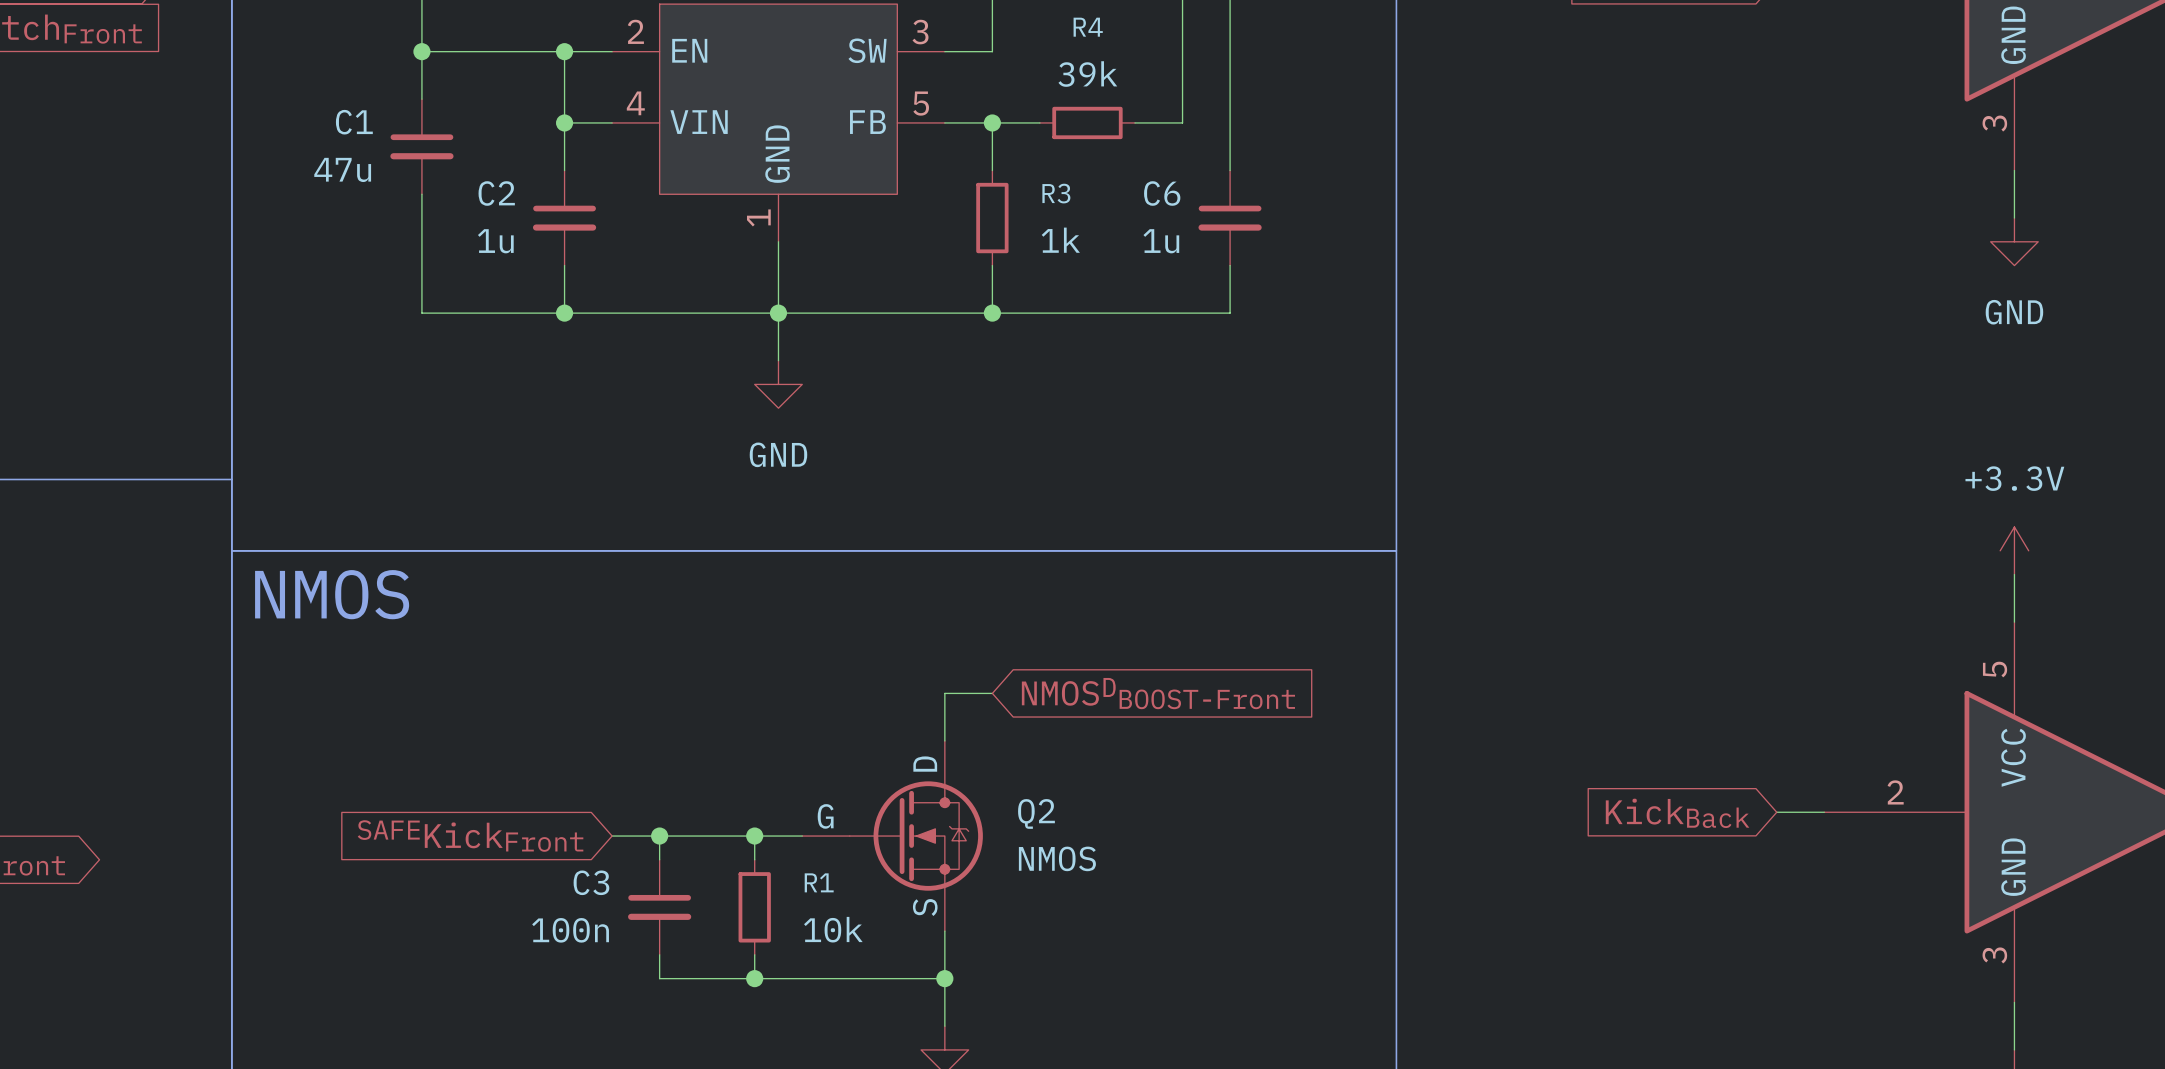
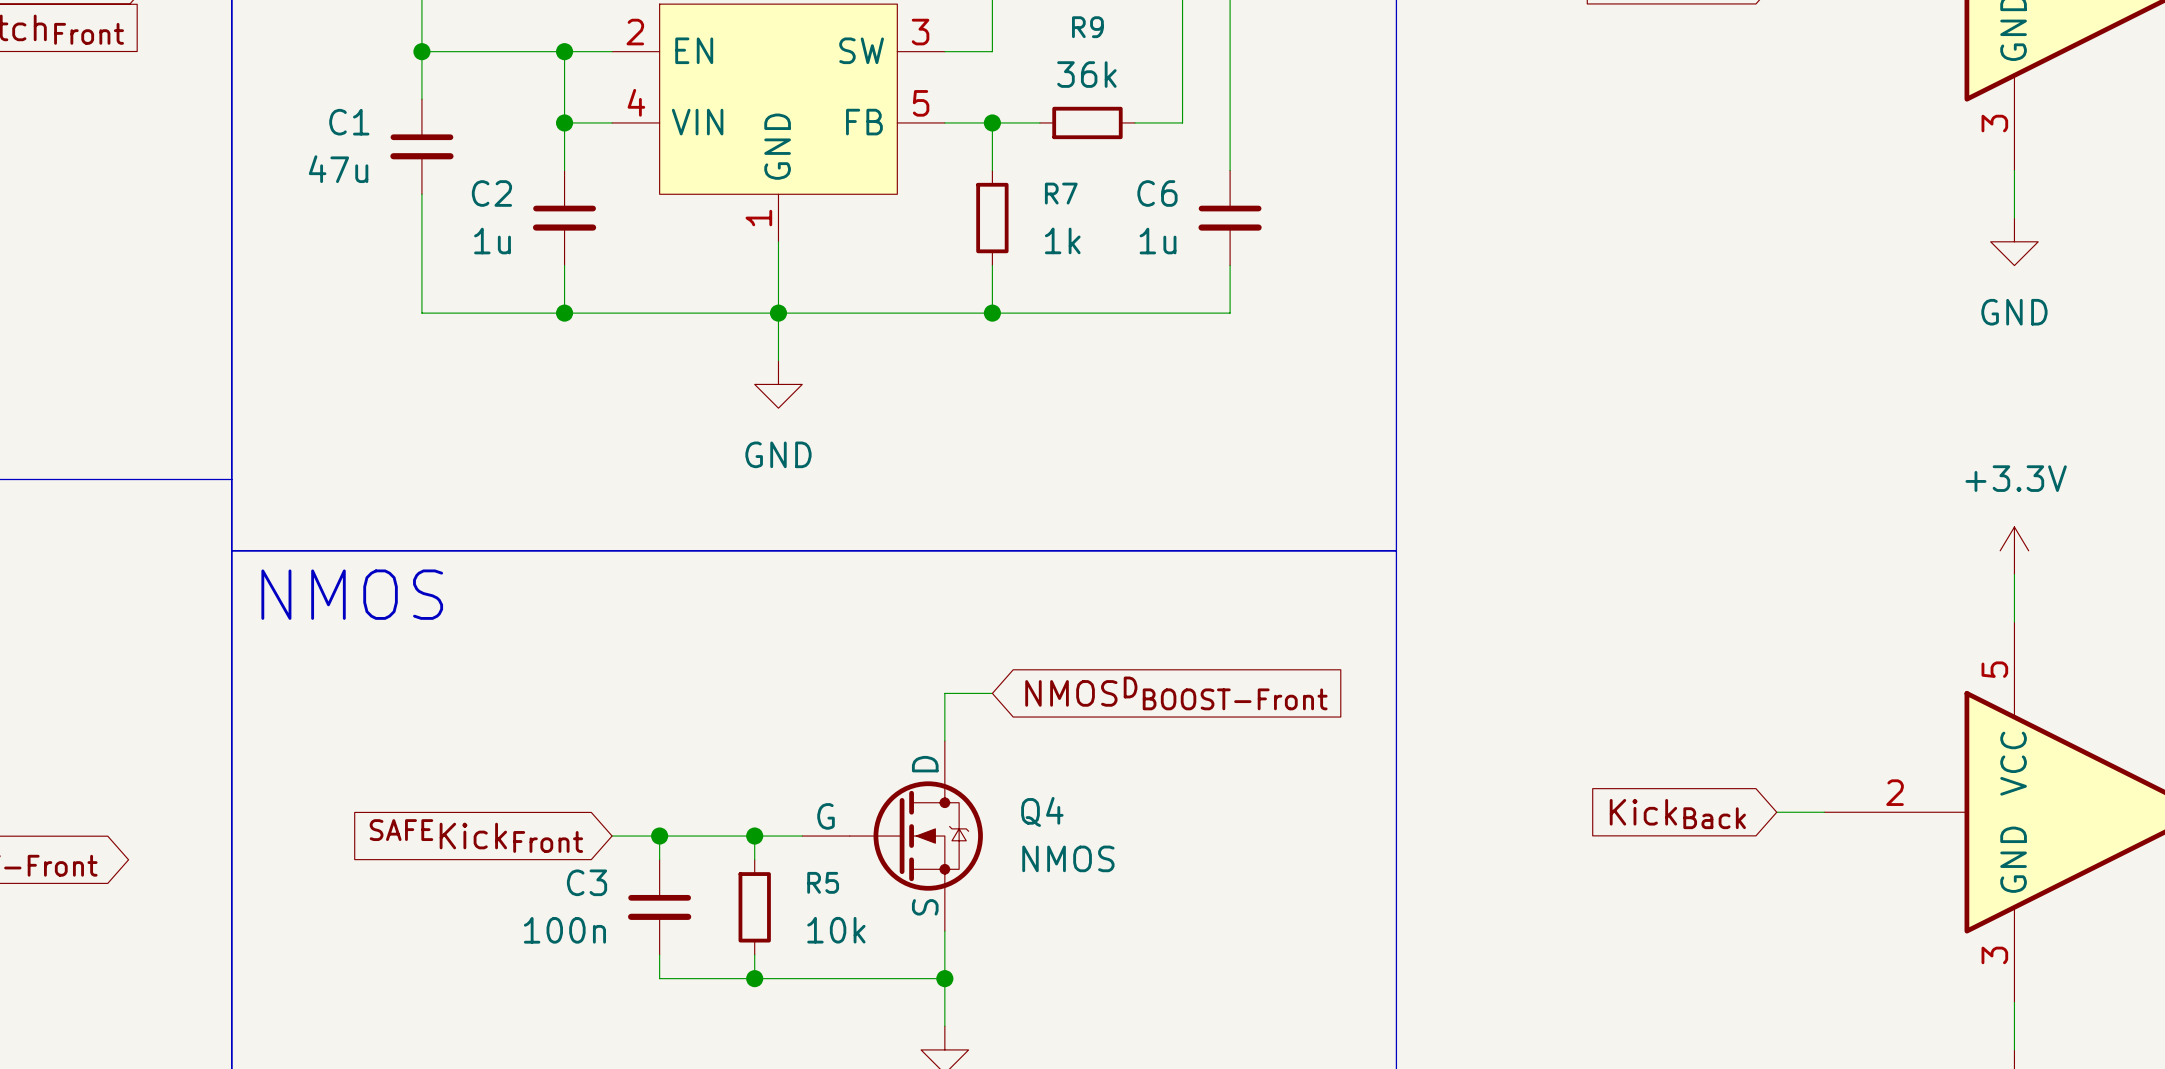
R4 name: R4 (1088, 27) -> R9 (1087, 27)
R4 value: 39k (1087, 74) -> 36k (1086, 74)
R3 name: R3 (1056, 193) -> R7 (1061, 193)
Q2 name: Q2 (1036, 813) -> Q4 (1042, 811)
R1 name: R1 (819, 882) -> R5 (823, 882)

